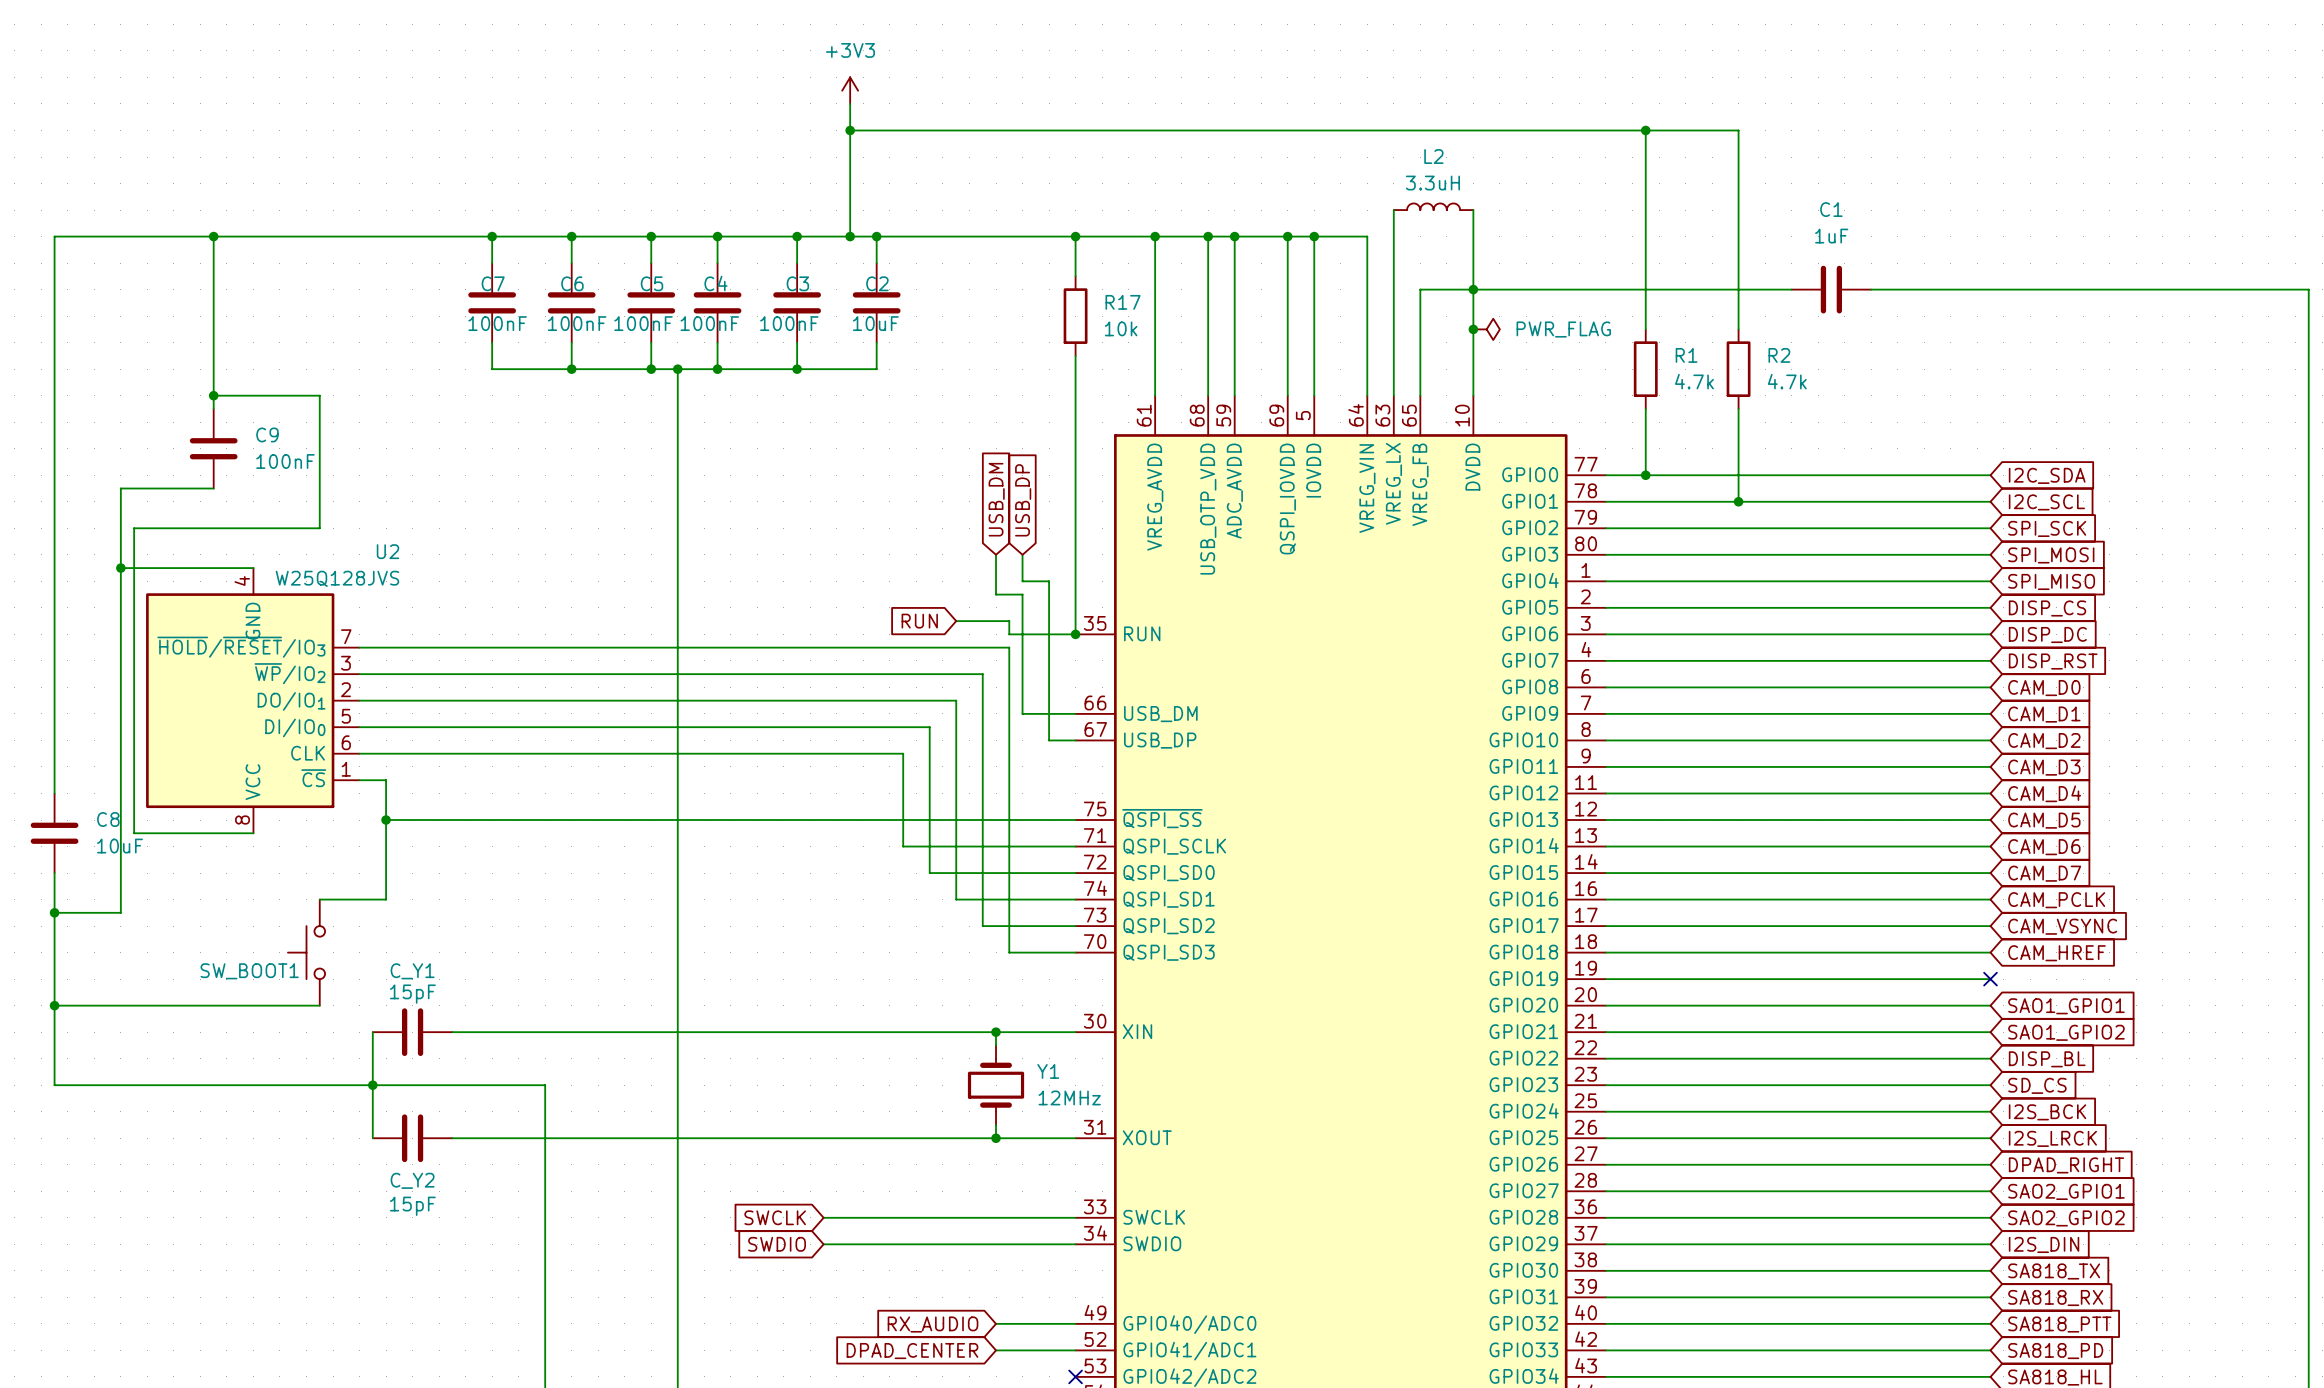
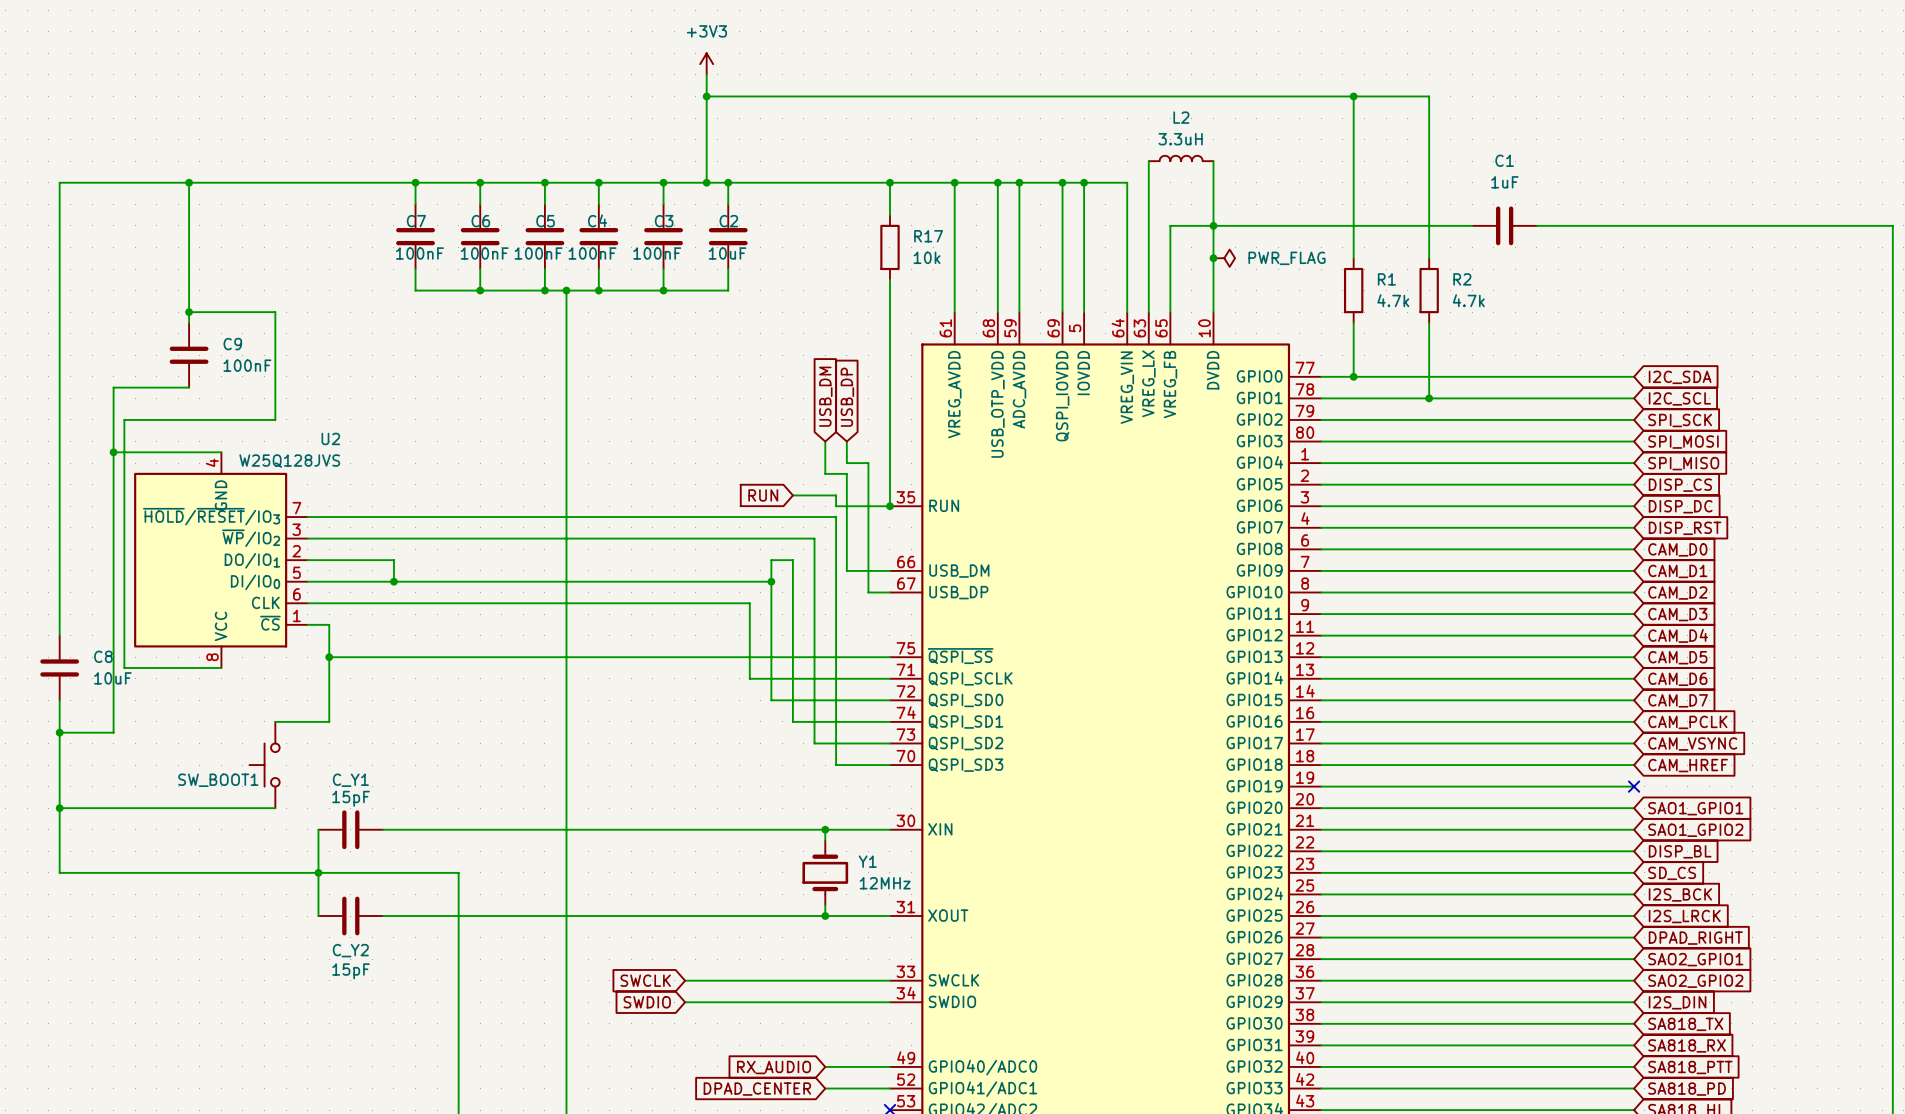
wire: (465, 700) (929, 700) -> (393, 560) (393, 581)
wire: none -> (771, 560) (771, 581)
junction: none -> (393, 581)
junction: none -> (771, 581)

